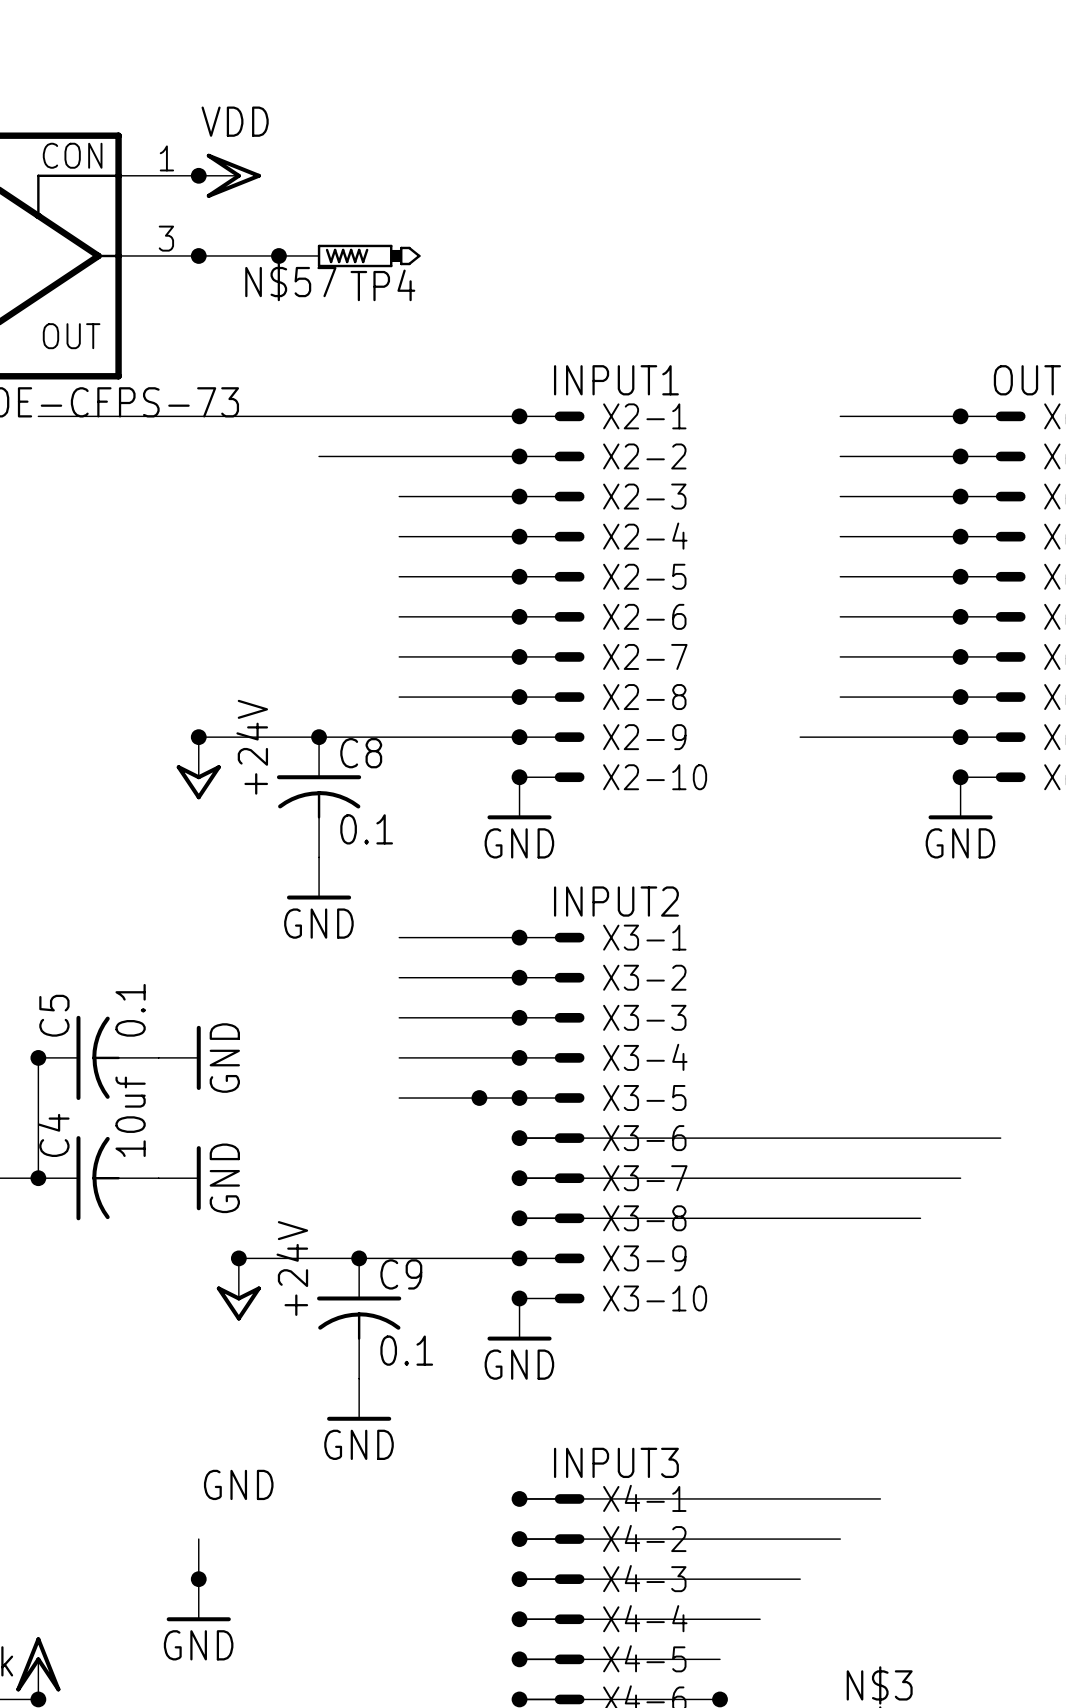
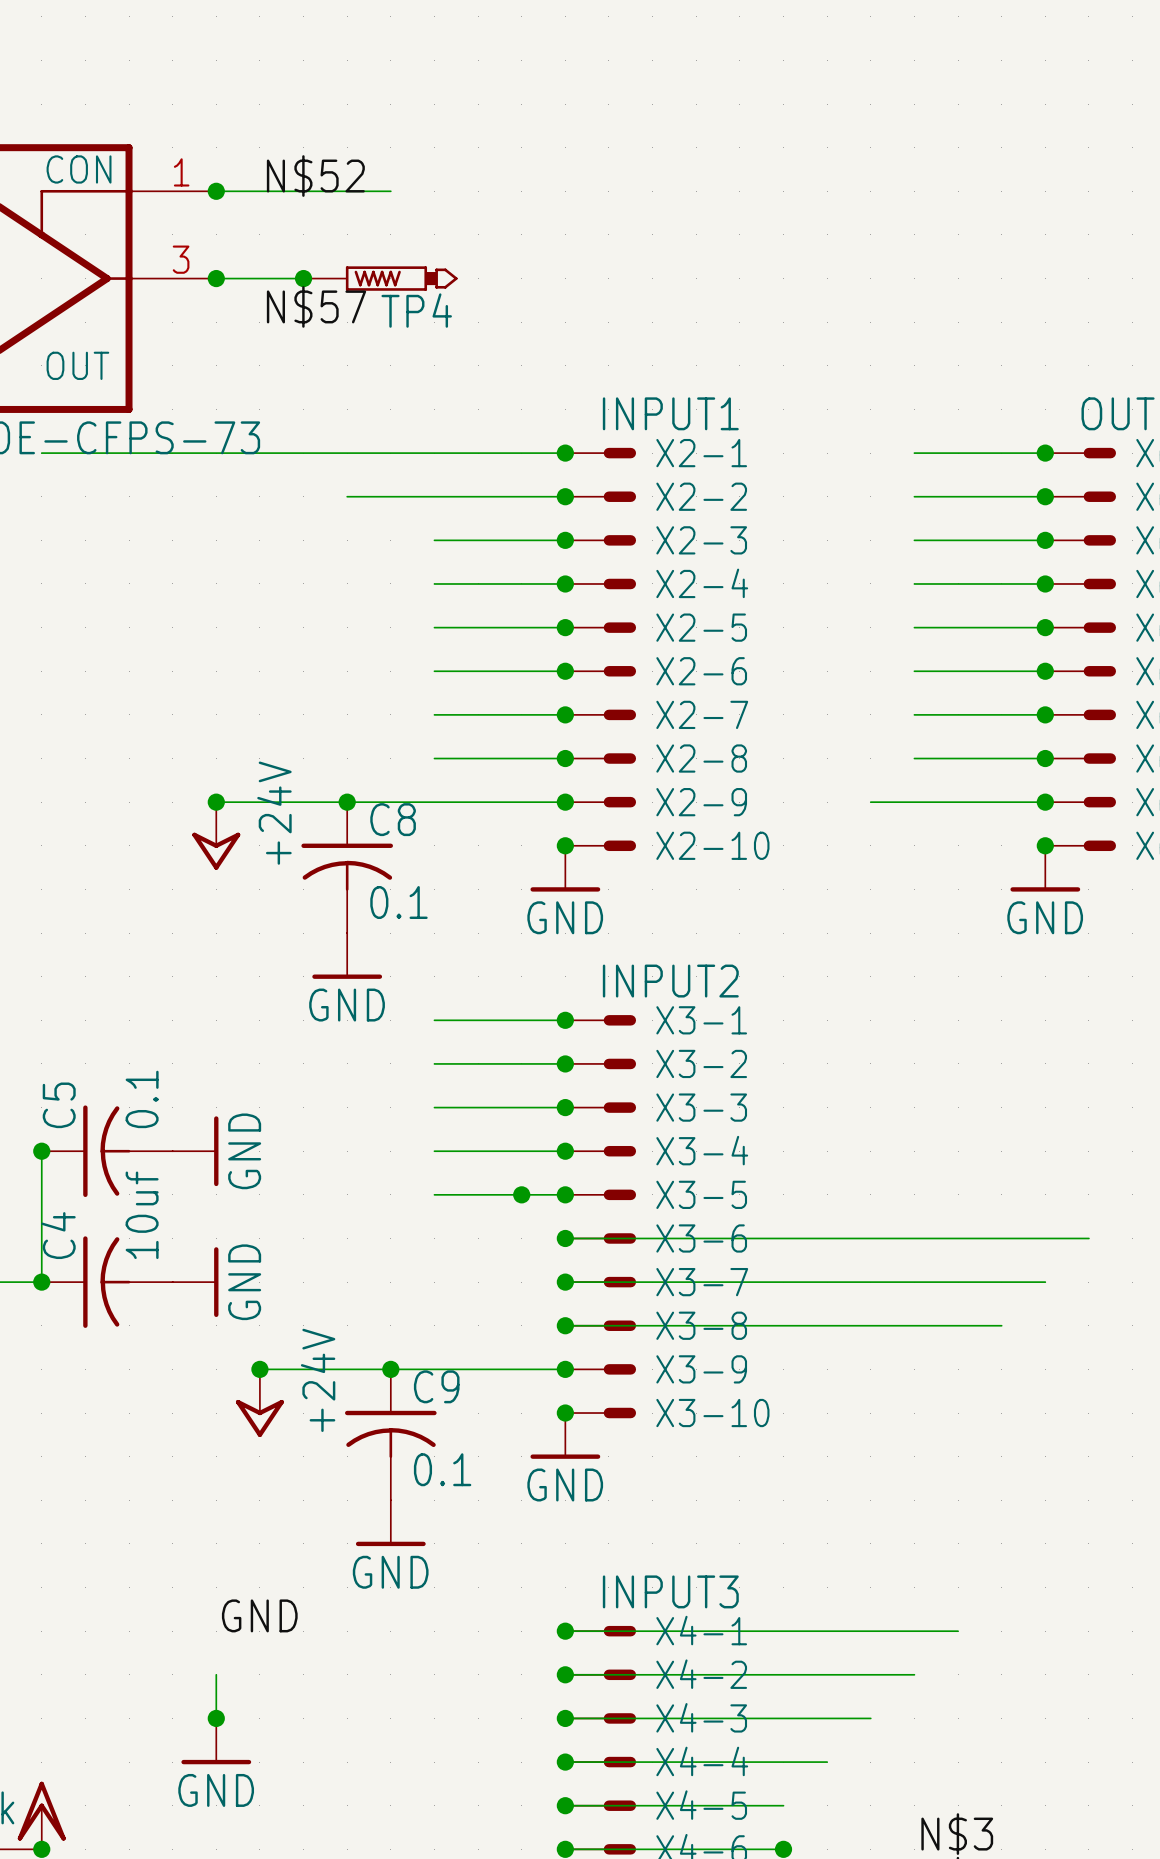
label: none -> N$52 (315, 176)
wire: none -> (216, 191) (390, 191)
power symbol: VDD (229, 175) -> none

